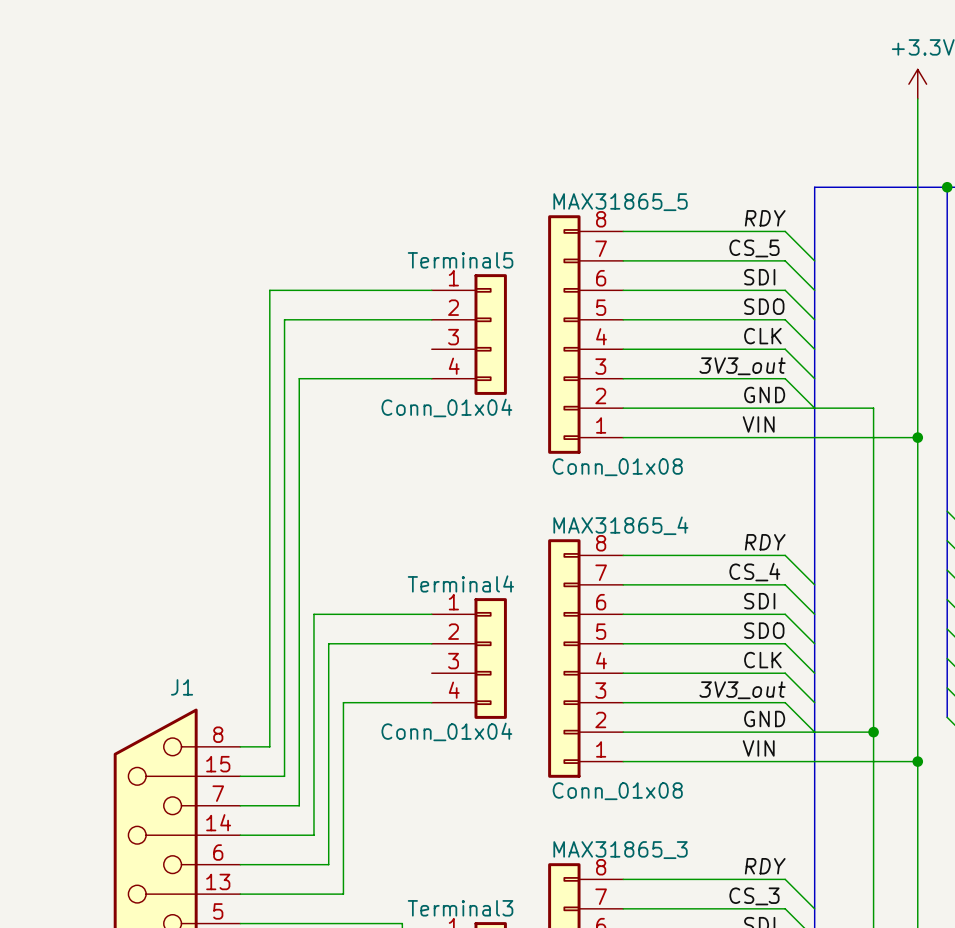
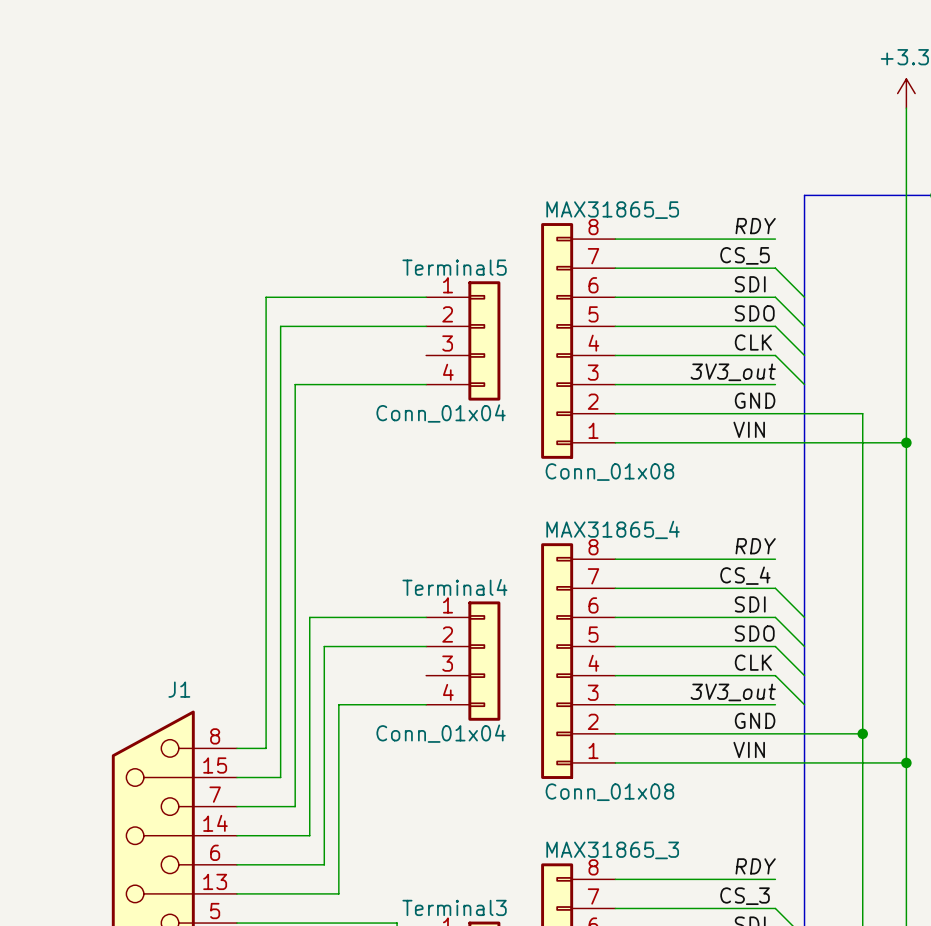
wire: (785, 231) (814, 260) -> none
wire: (785, 378) (814, 408) -> none
wire: (785, 555) (814, 584) -> none
wire: (785, 702) (814, 732) -> none
wire: (785, 879) (814, 908) -> none

